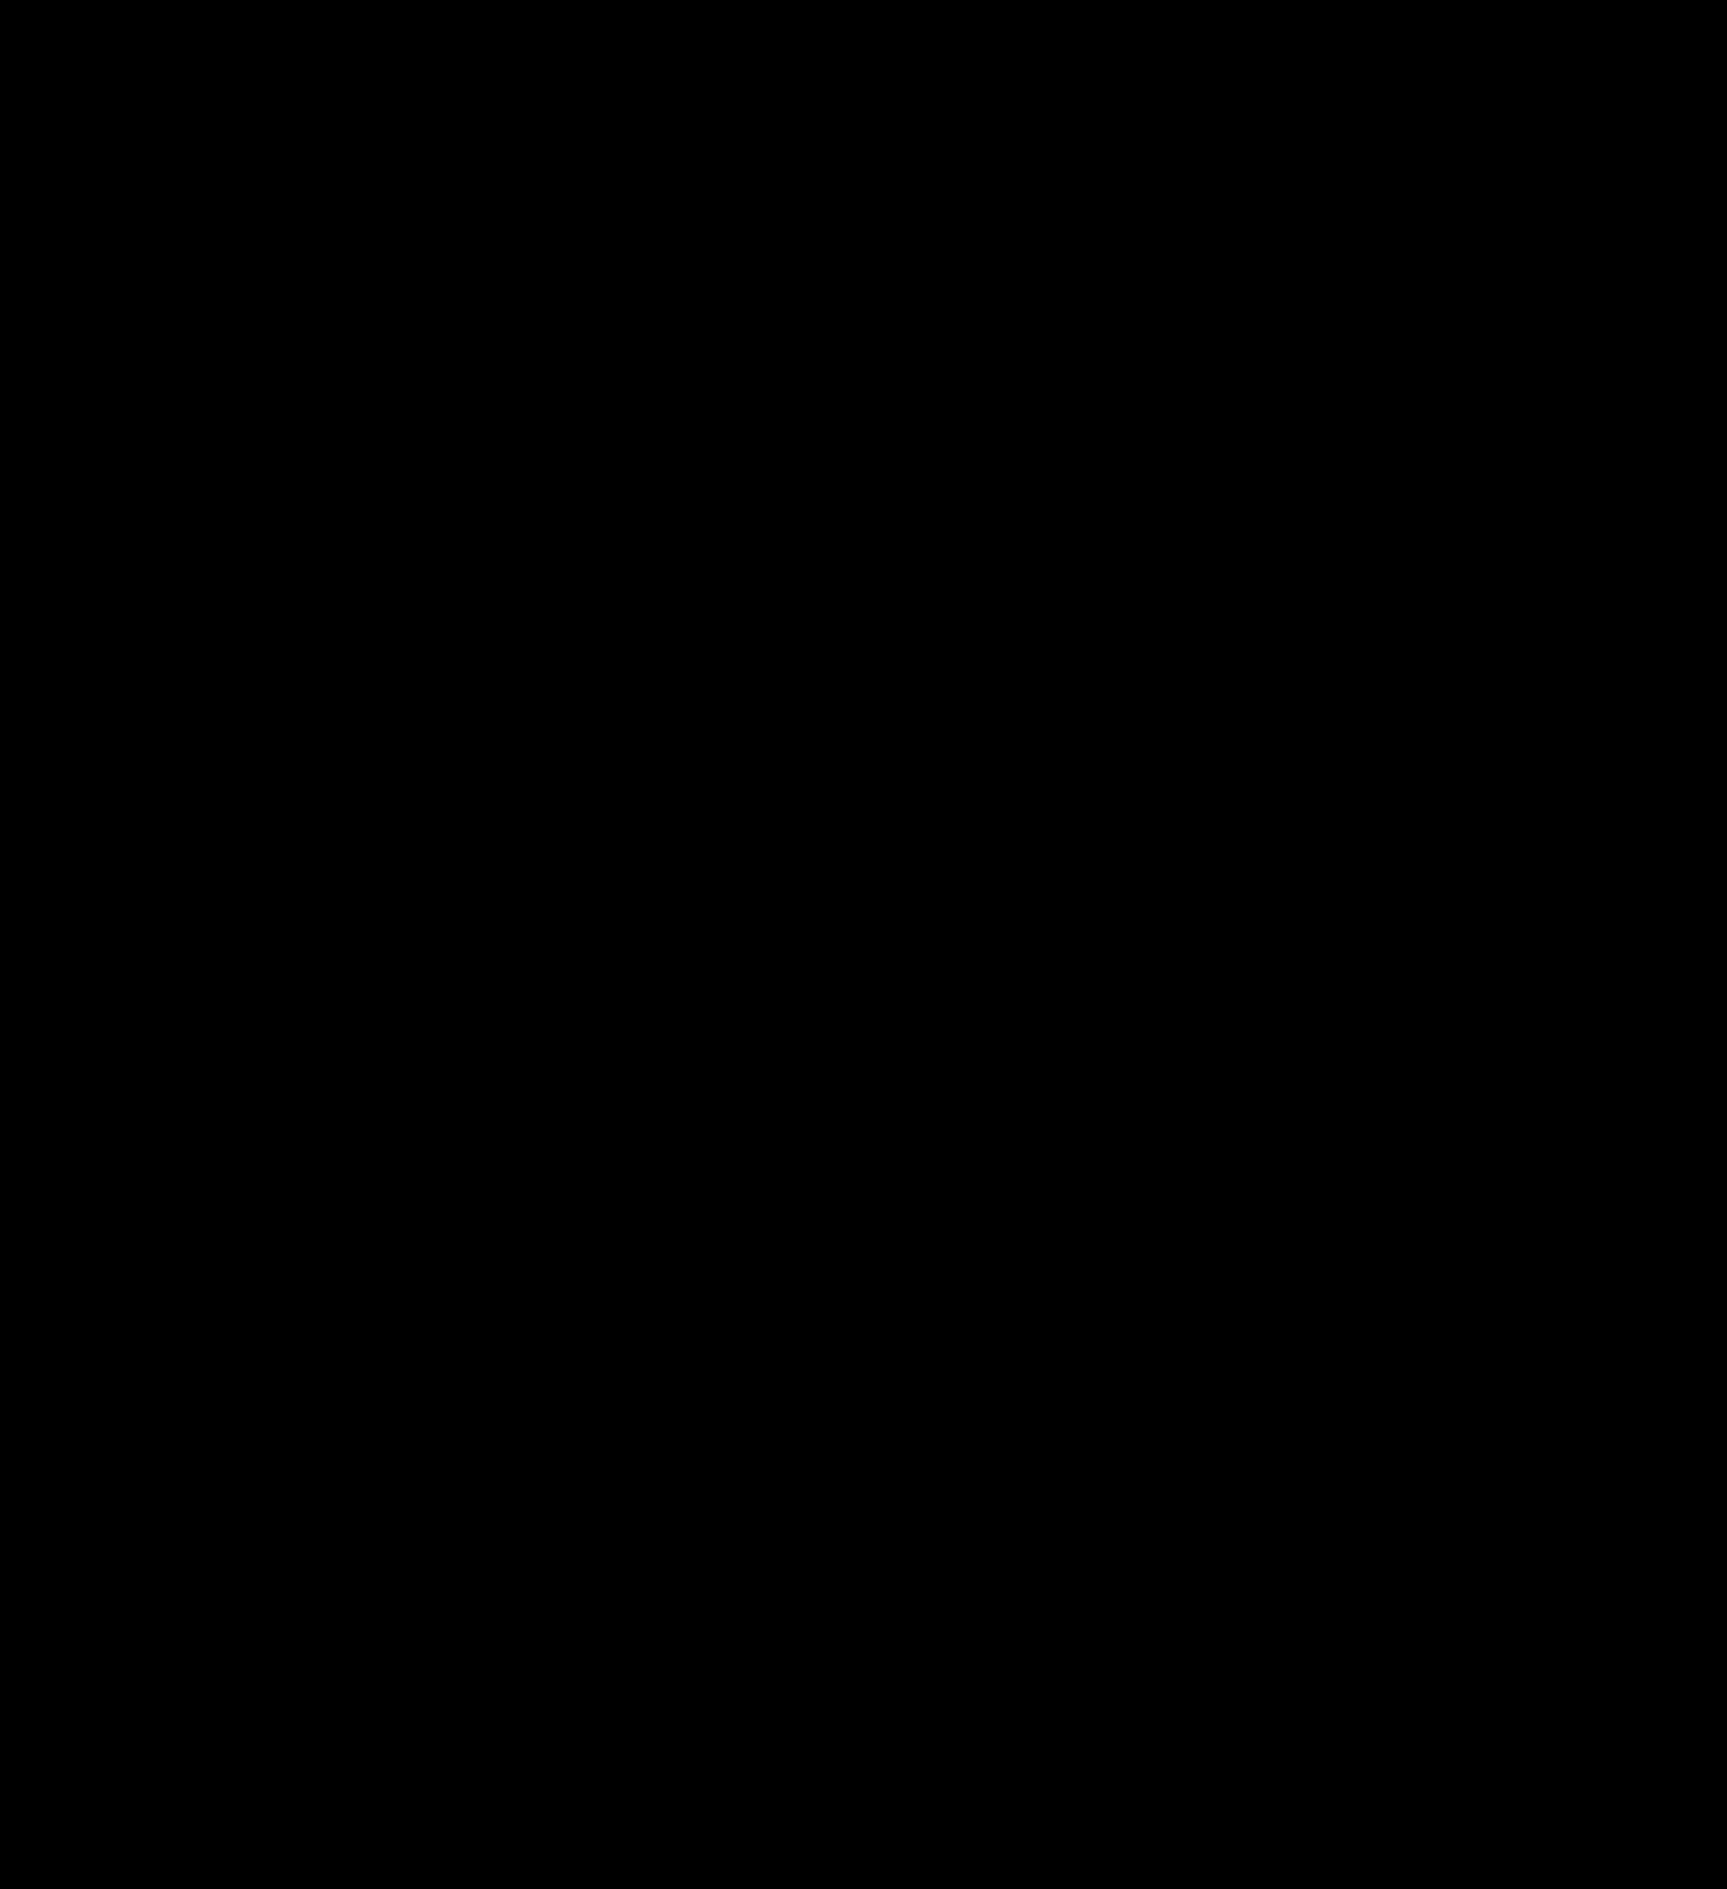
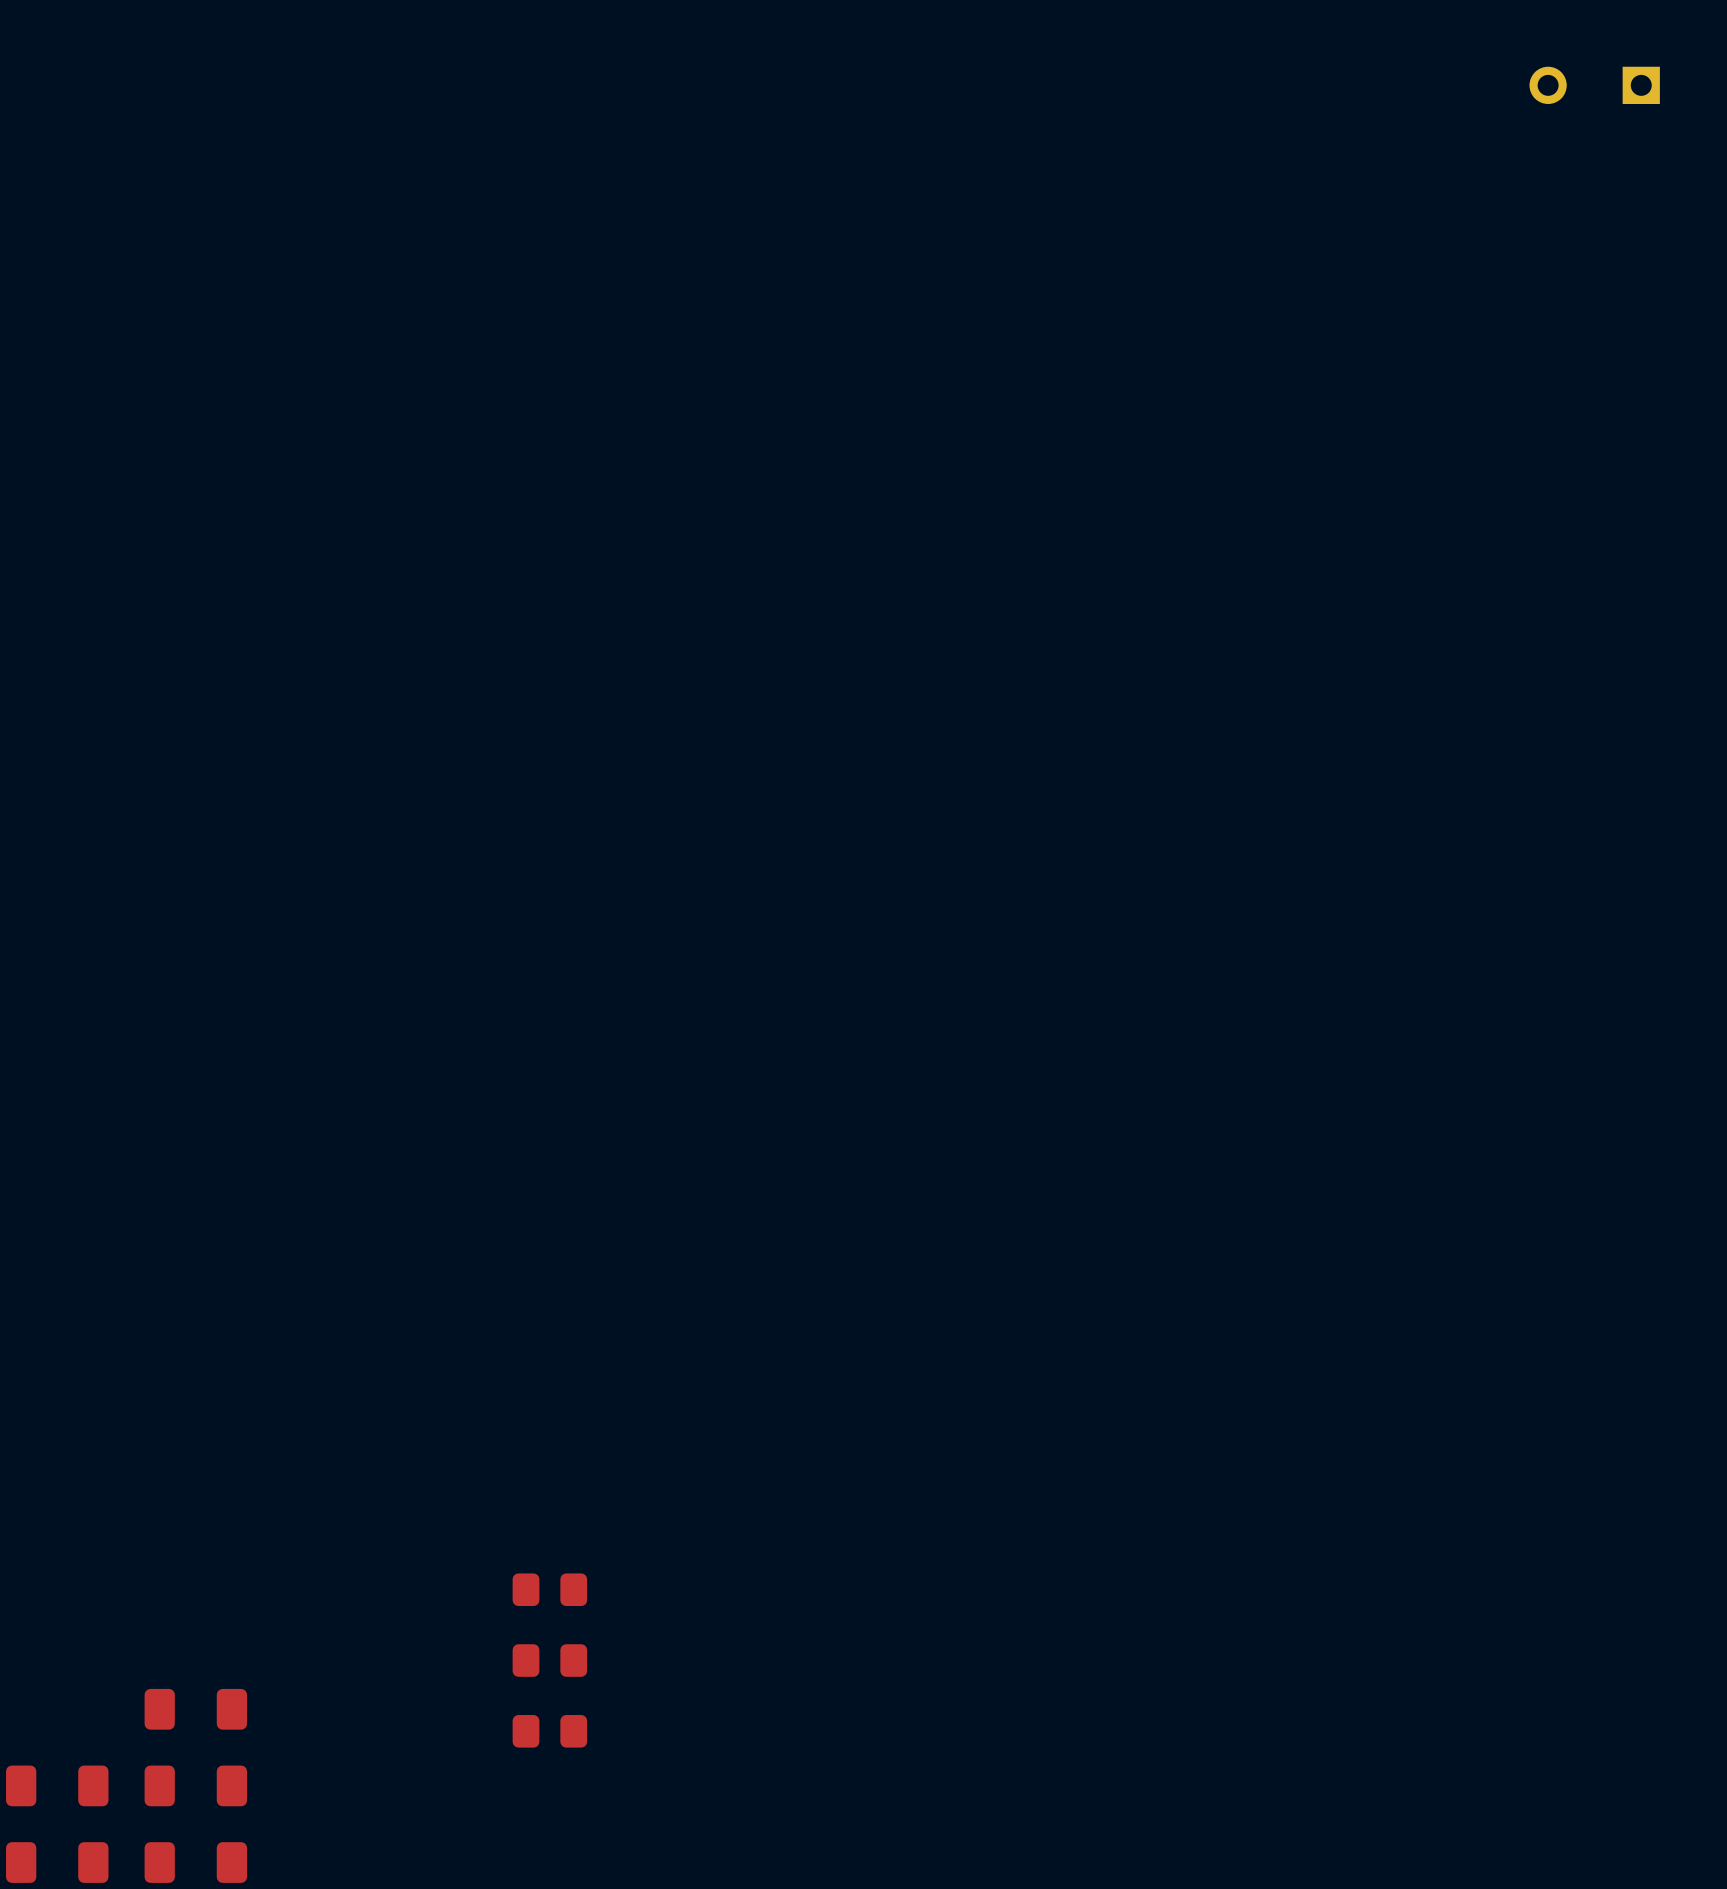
part: none -> (1594, 85)
part: none -> (549, 1589)
part: none -> (549, 1660)
part: none -> (195, 1709)
part: none -> (549, 1731)
part: none -> (57, 1785)
part: none -> (195, 1785)
part: none -> (57, 1862)
part: none -> (195, 1862)

